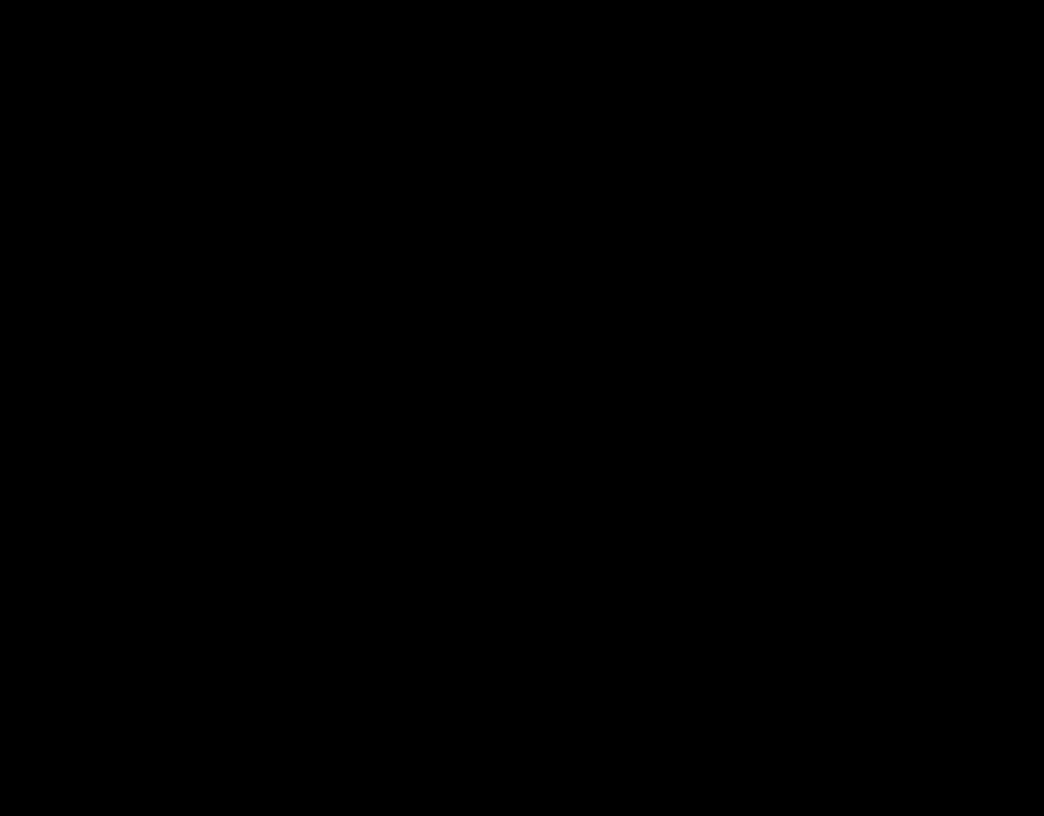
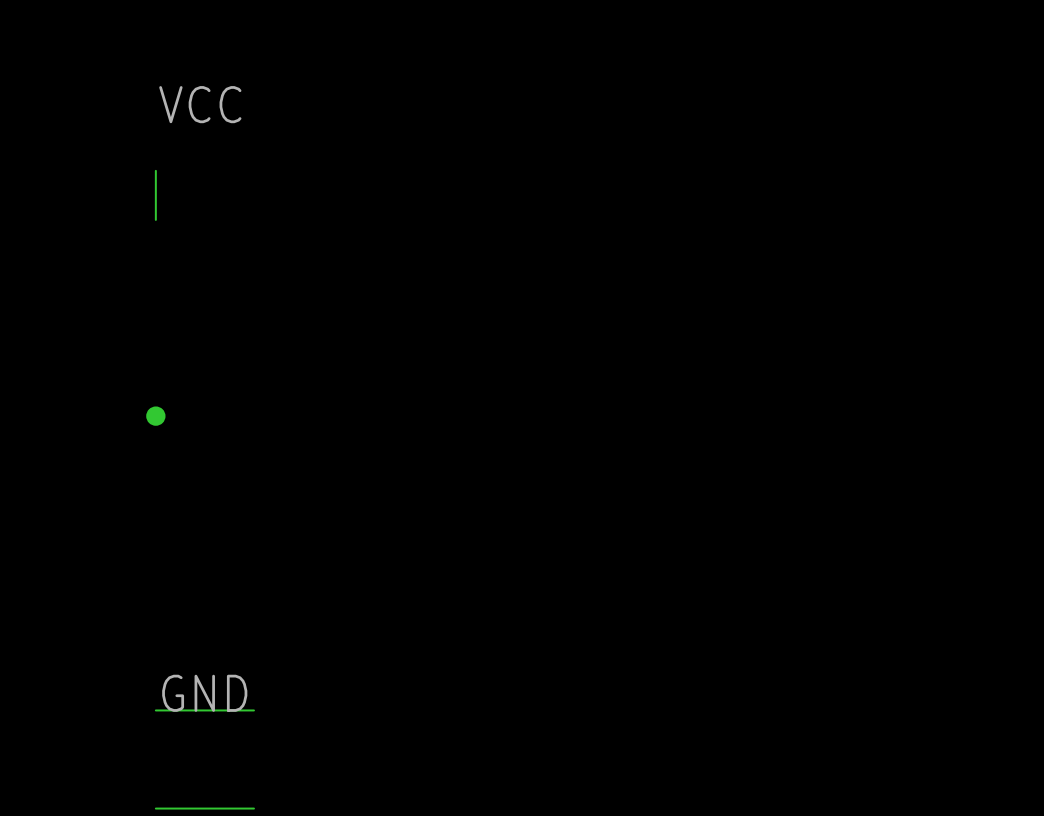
label: none -> VCC (200, 104)
wire: none -> (155, 170) (155, 219)
junction: none -> (155, 416)
label: none -> GND (204, 693)
wire: none -> (155, 710) (253, 710)
wire: none -> (155, 808) (253, 808)

